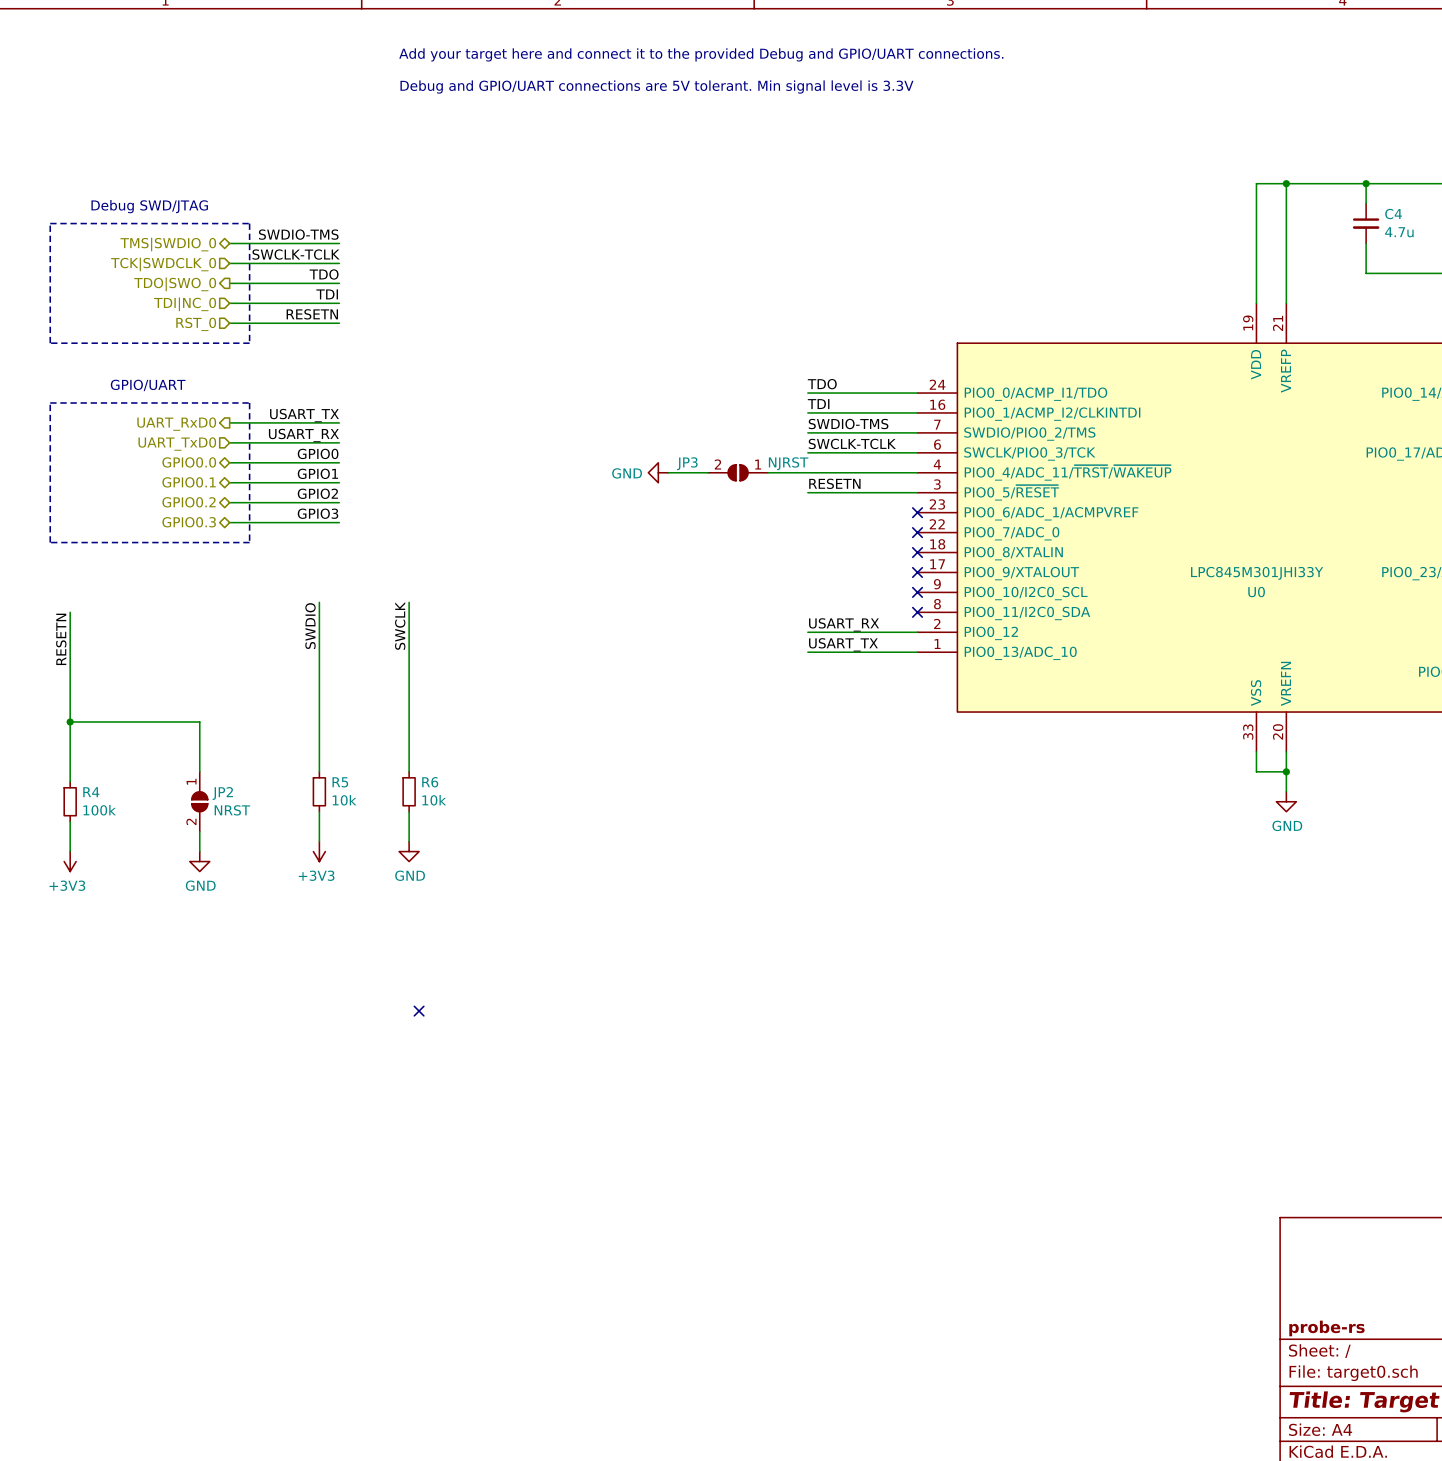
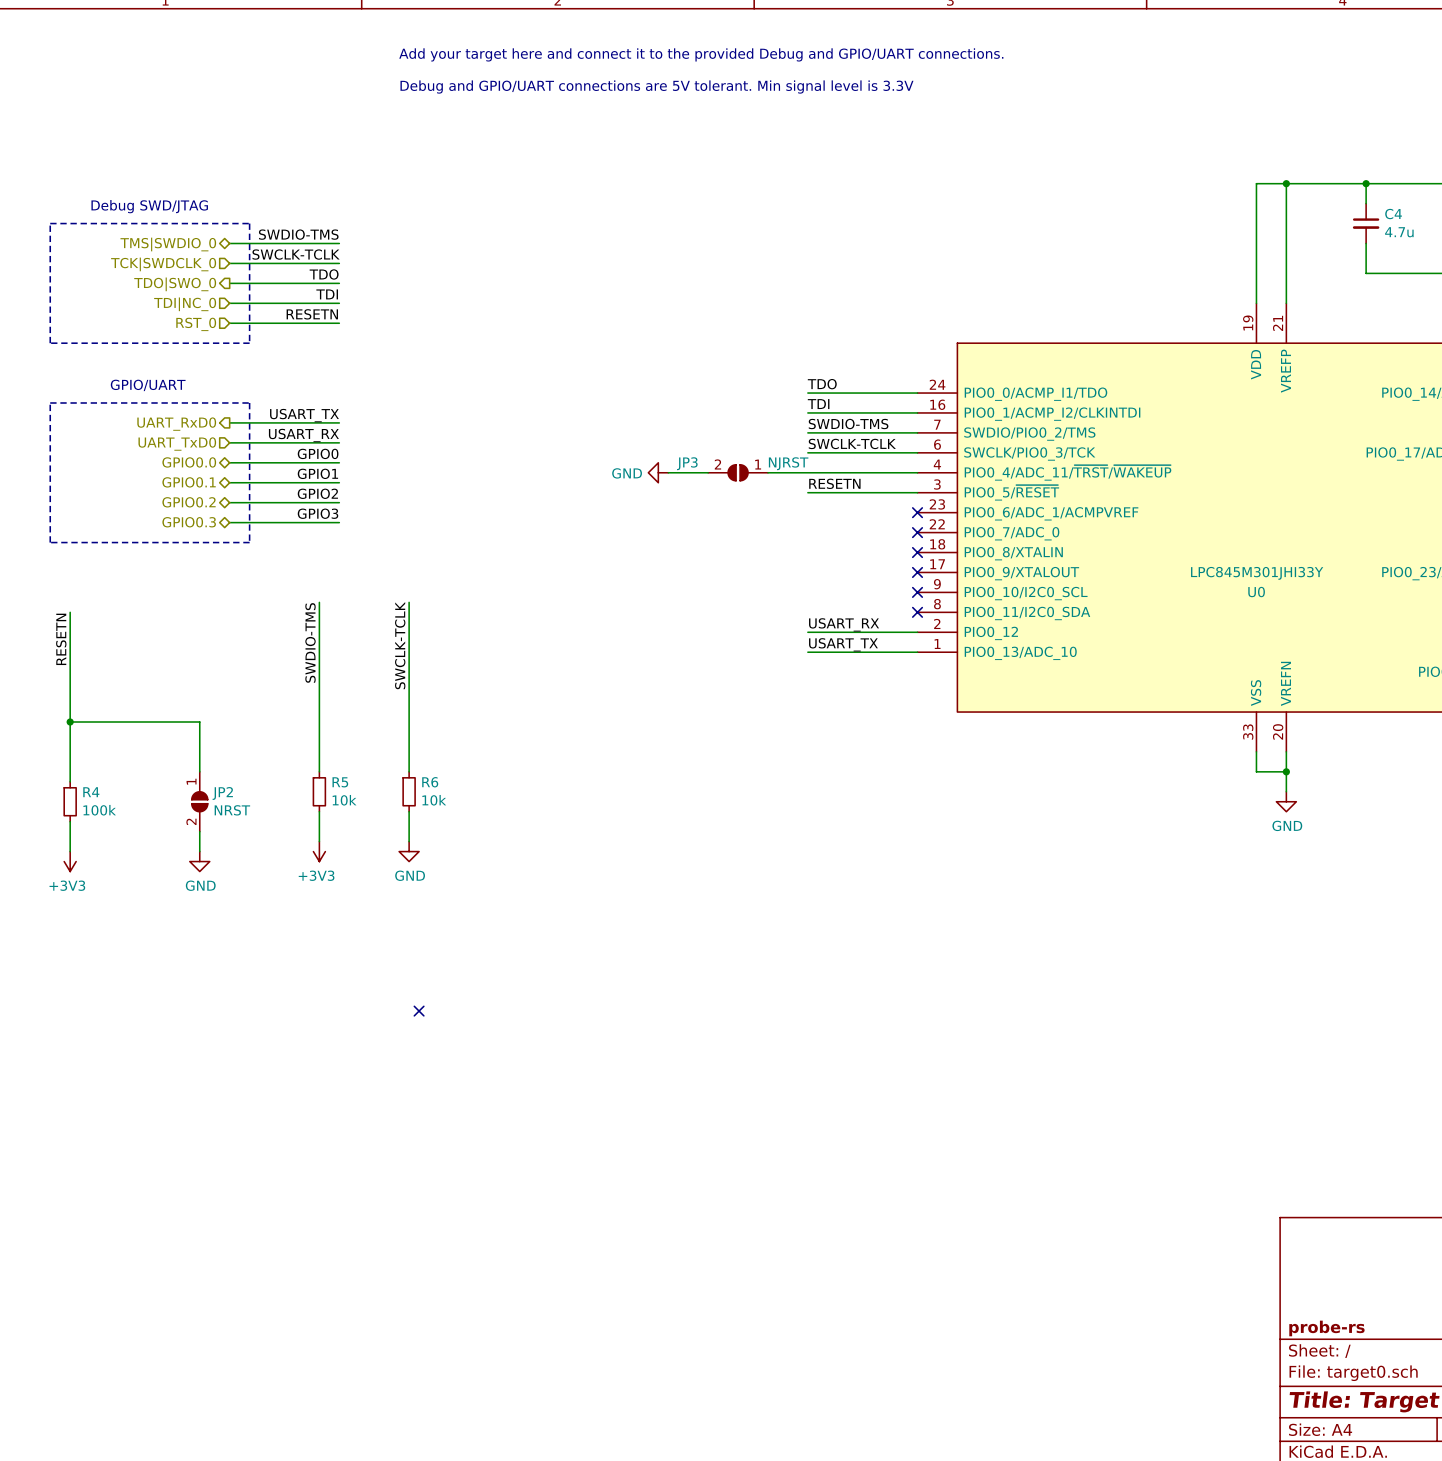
label: SWCLK (400, 625) -> SWCLK-TCLK (400, 645)
label: SWDIO (310, 626) -> SWDIO-TMS (310, 642)

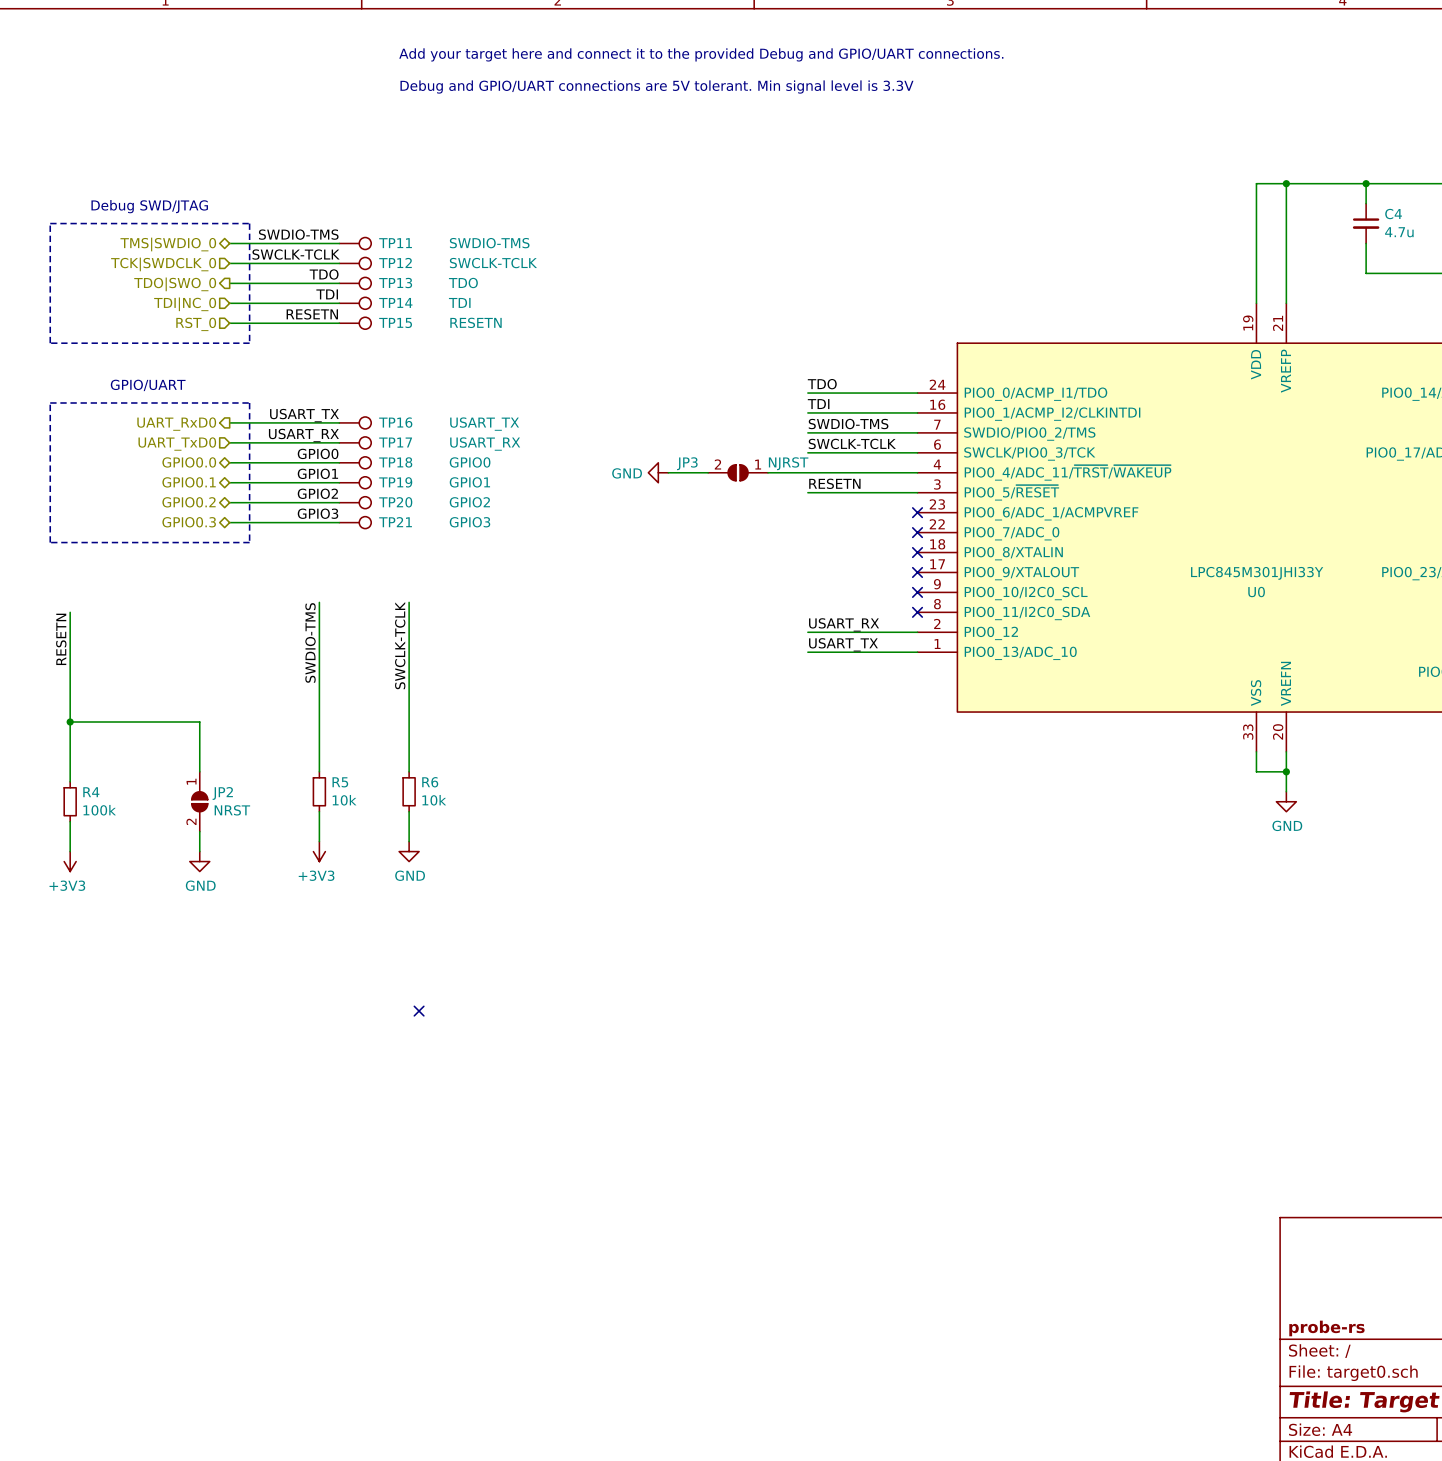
TP11: none -> SWDIO-TMS (355, 243)
TP12: none -> SWCLK-TCLK (355, 263)
TP13: none -> TDO (355, 283)
TP14: none -> TDI (355, 303)
TP15: none -> RESETN (355, 323)
TP16: none -> USART_TX (355, 422)
TP17: none -> USART_RX (355, 442)
TP18: none -> GPIO0 (355, 462)
TP19: none -> GPIO1 (355, 482)
TP20: none -> GPIO2 (355, 502)
TP21: none -> GPIO3 (355, 522)

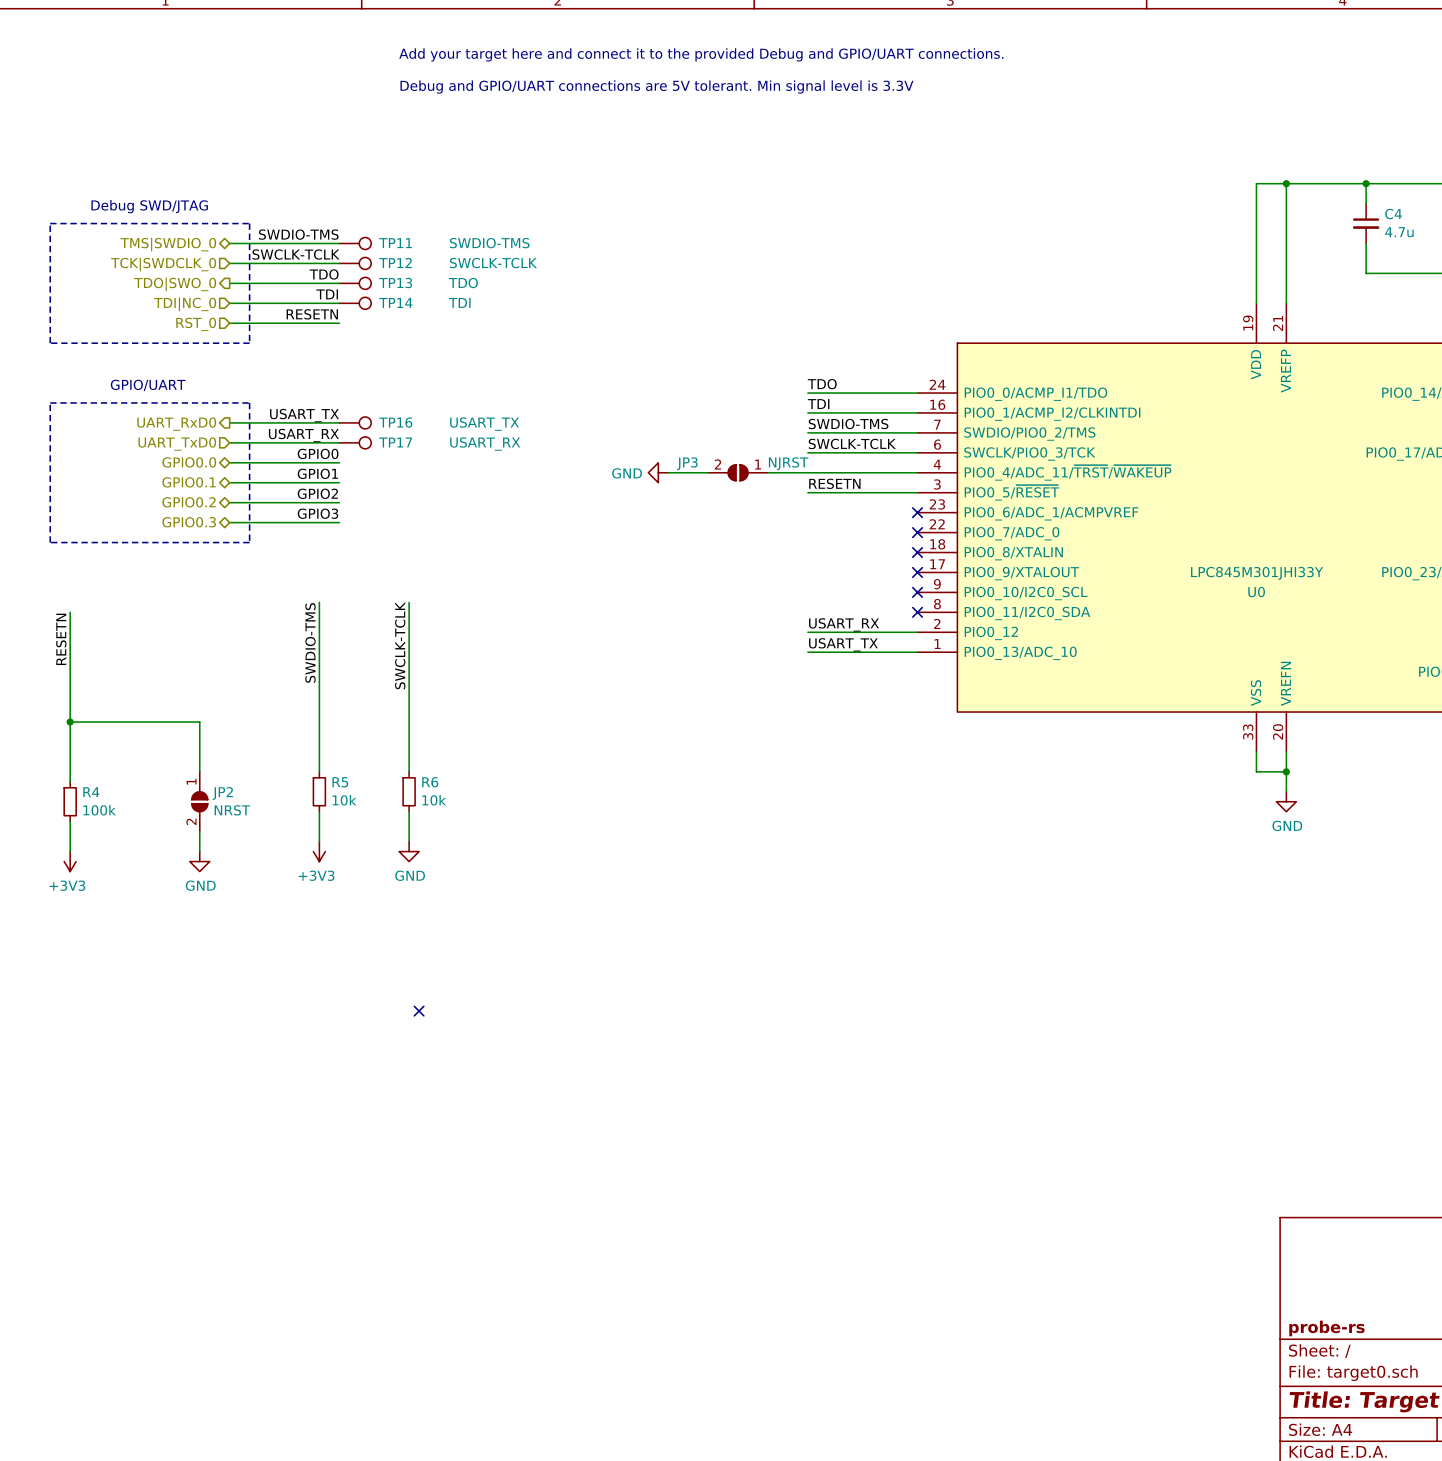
TP15: RESETN (355, 323) -> none
TP18: GPIO0 (355, 462) -> none
TP19: GPIO1 (355, 482) -> none
TP20: GPIO2 (355, 502) -> none
TP21: GPIO3 (355, 522) -> none

